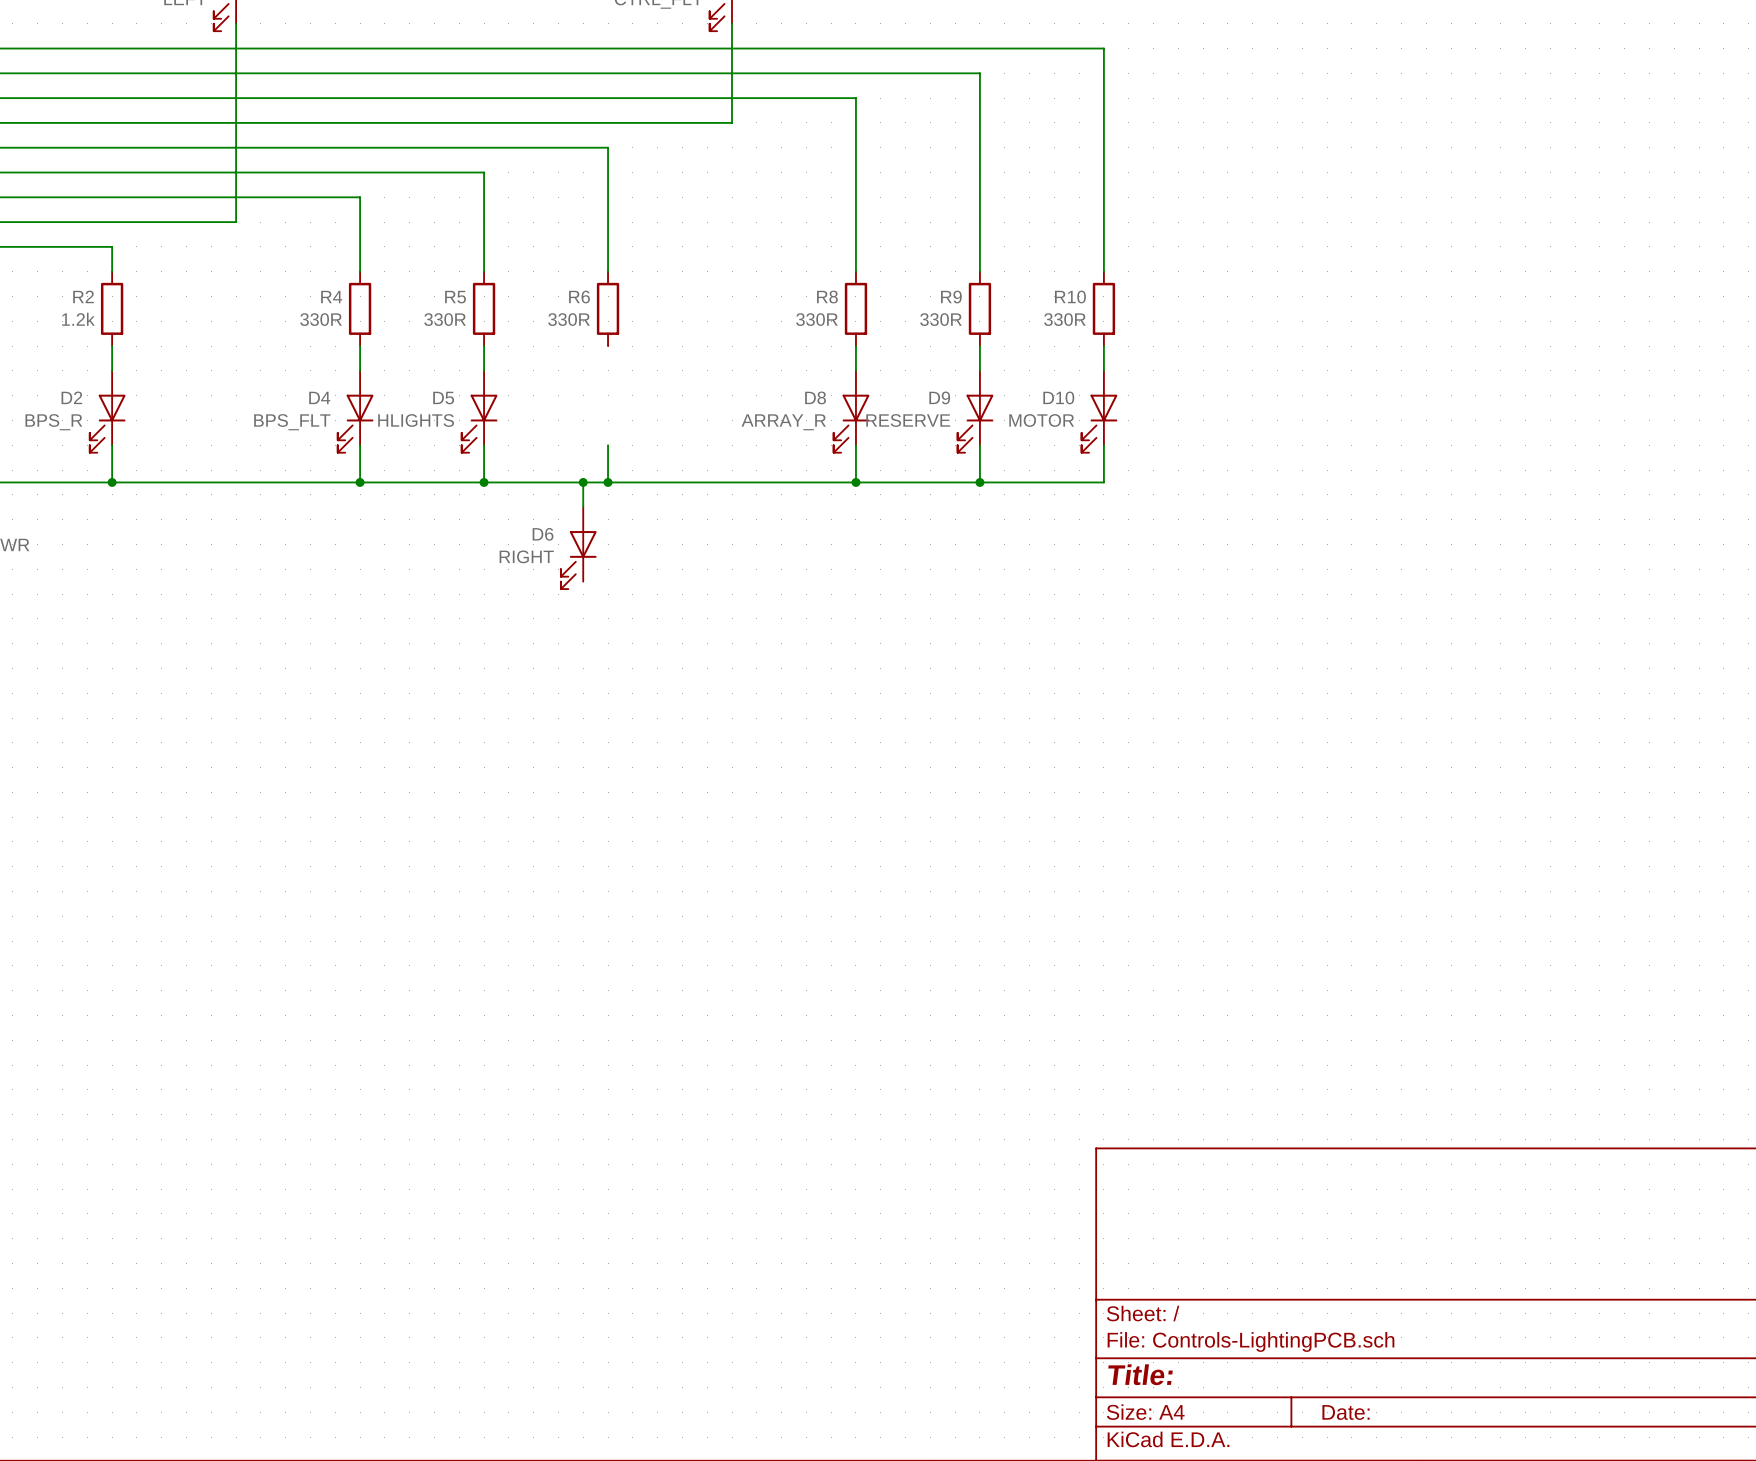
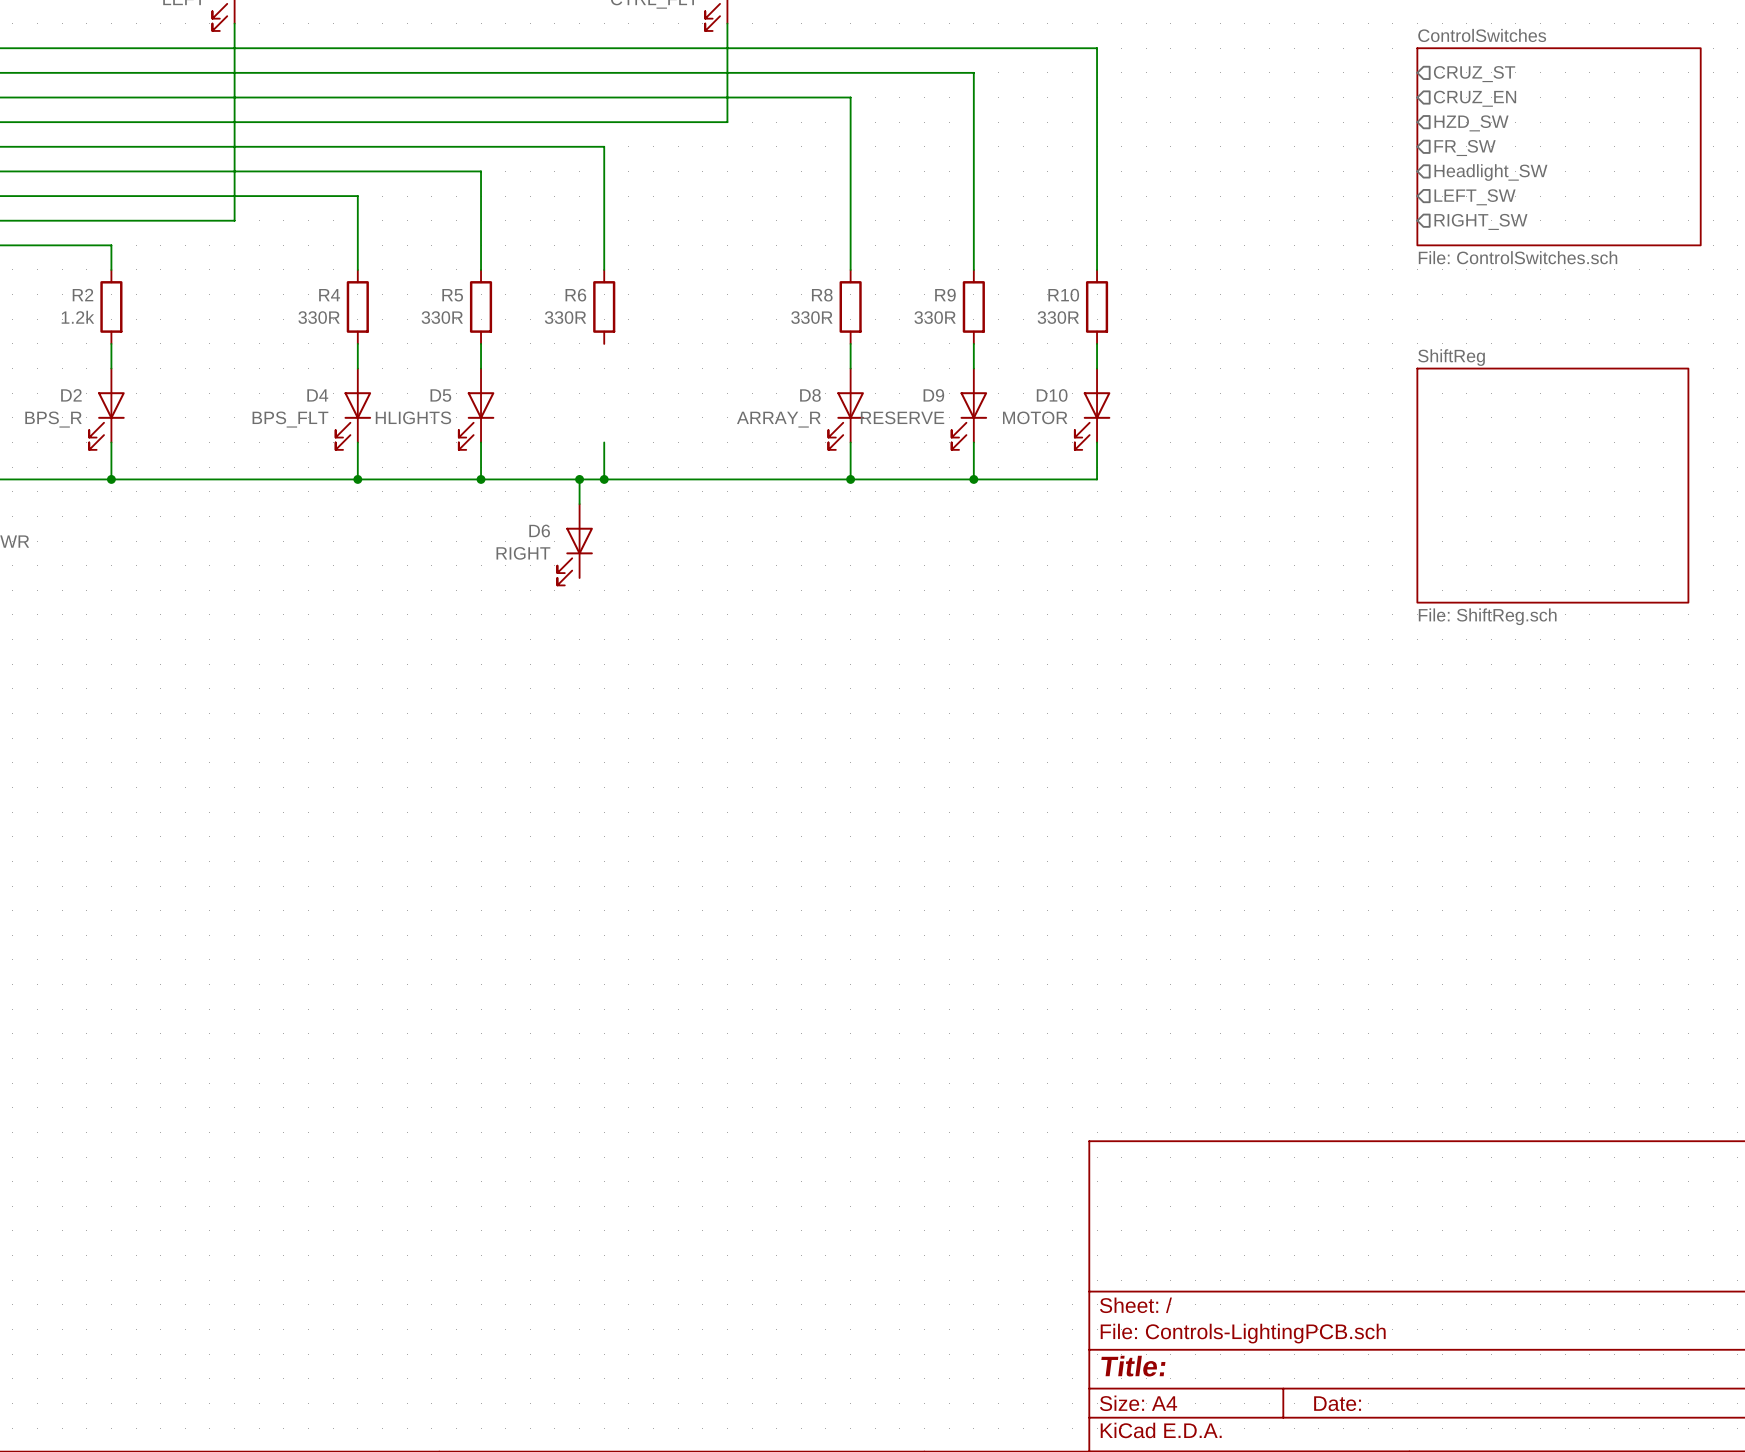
sheet pin: none -> CRUZ_ST (1474, 74)
sheet pin: none -> CRUZ_EN (1475, 98)
sheet pin: none -> HZD_SW (1471, 123)
sheet ControlSwitches: none -> File: ControlSwitches.sch (1559, 146)
sheet pin: none -> FR_SW (1465, 148)
sheet pin: none -> Headlight_SW (1490, 172)
sheet pin: none -> LEFT_SW (1475, 197)
sheet pin: none -> RIGHT_SW (1480, 221)
sheet ShiftReg: none -> File: ShiftReg.sch (1552, 485)

